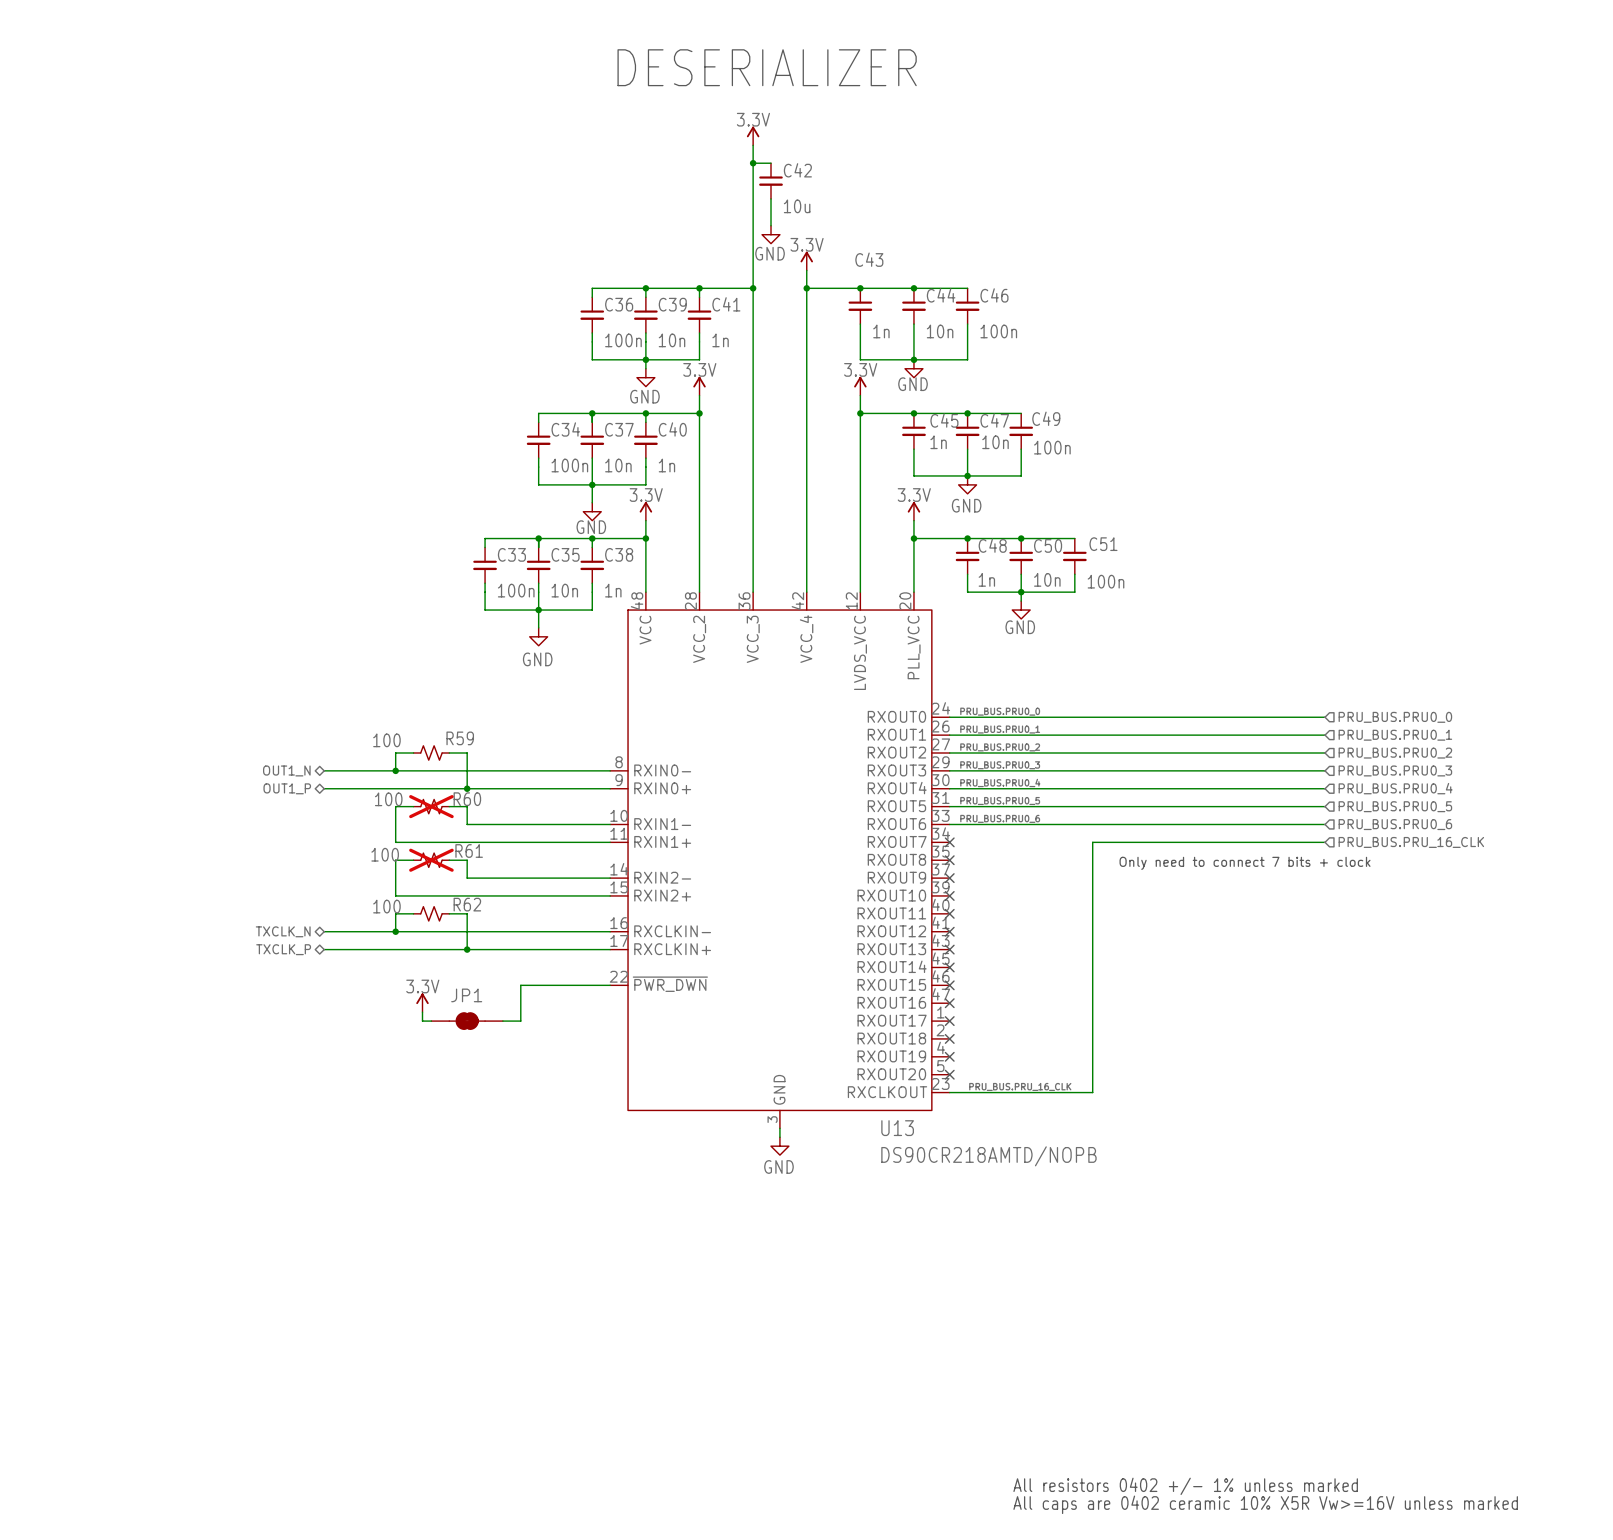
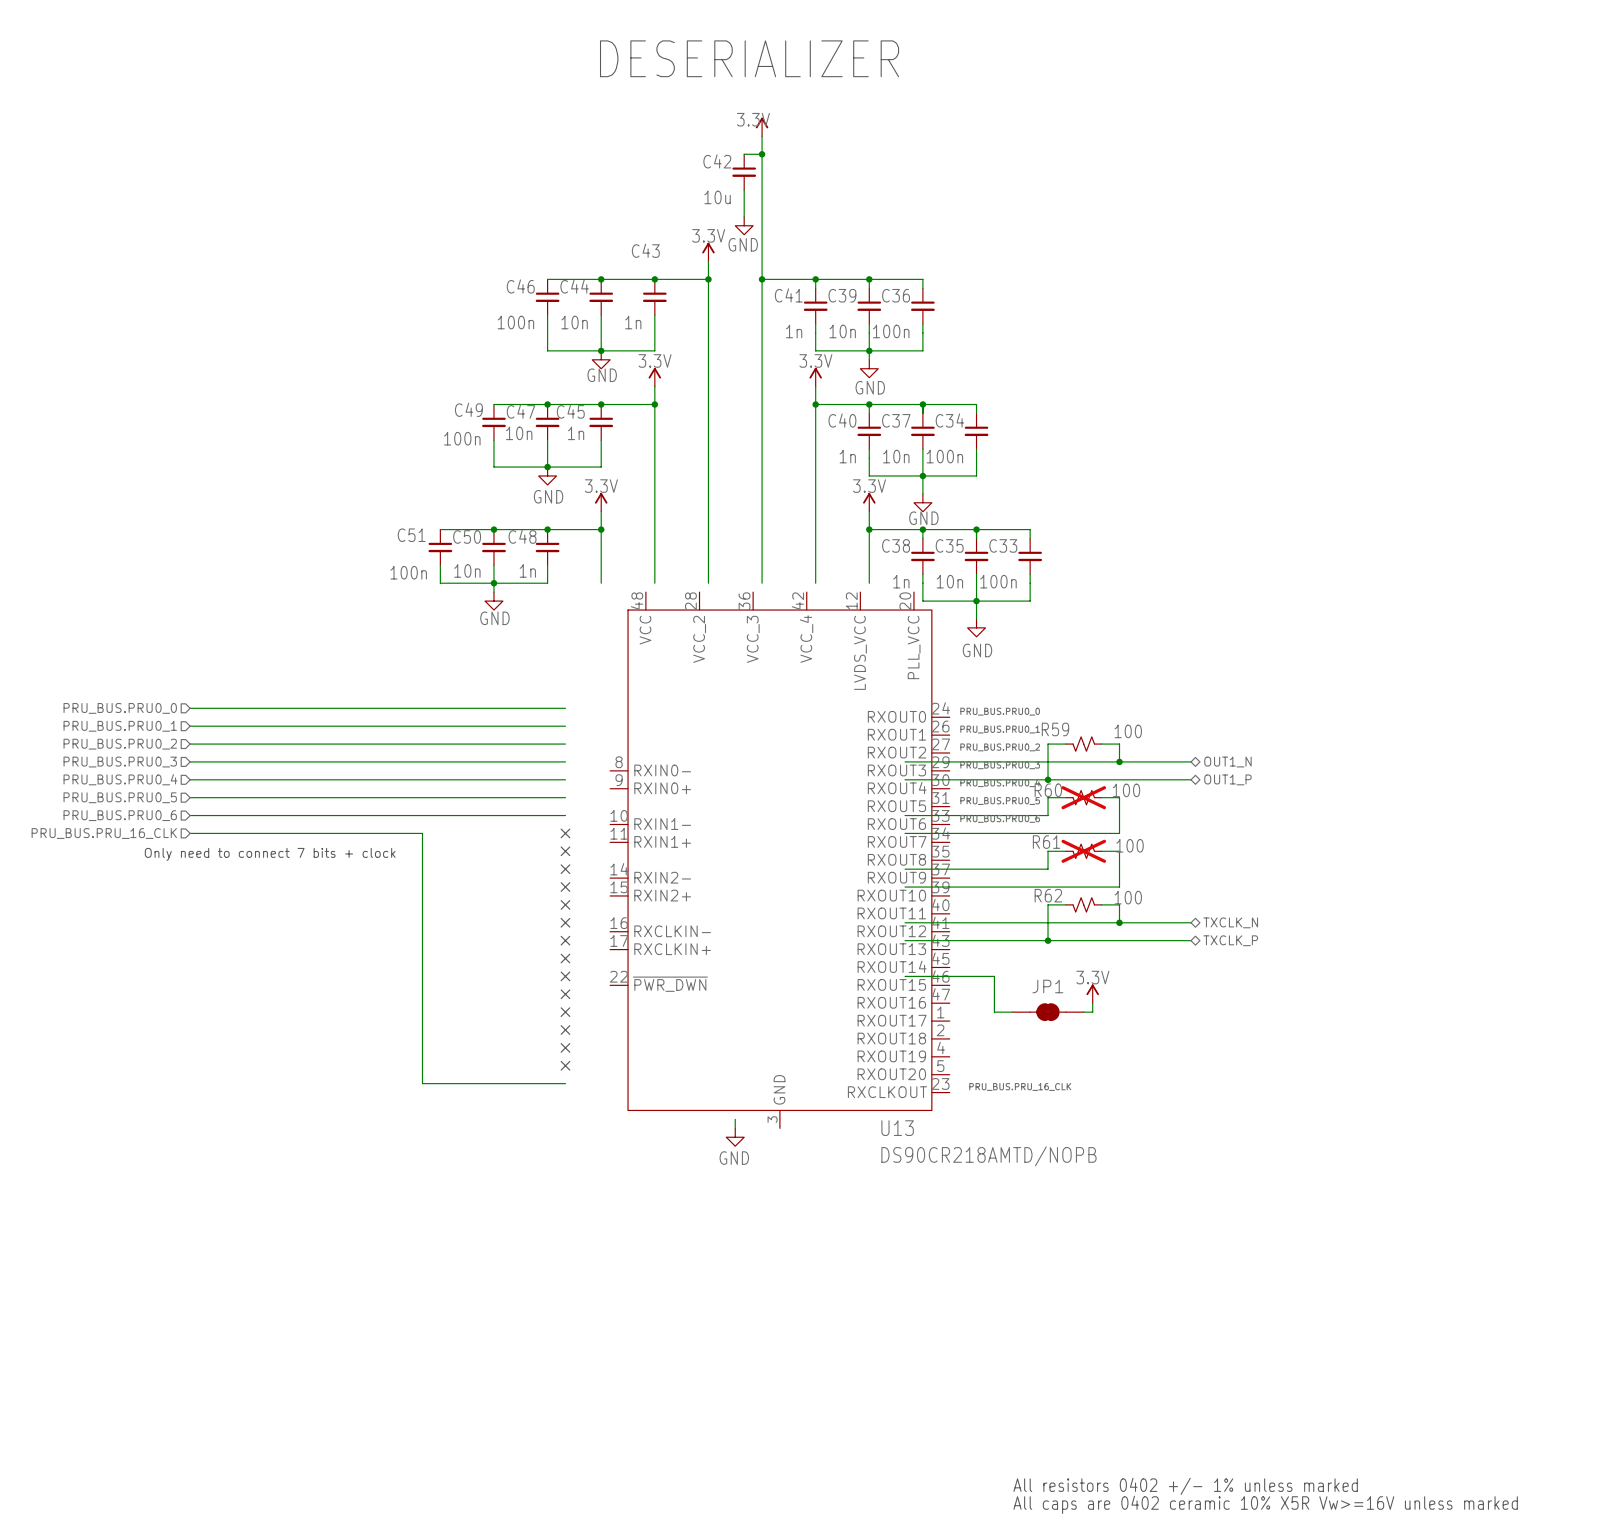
text: none -> DESERIALIZER (749, 58)
text: DESERIALIZER (767, 67) -> none
power symbol position: 3.3V (753, 135) -> 3.3V (762, 127)
wire: (753, 145) (753, 592) -> (762, 136) (762, 583)
wire: (753, 163) (771, 163) -> (744, 154) (762, 154)
junction position: (753, 163) -> (762, 154)
C42 name position: C42 (797, 170) -> C42 (717, 161)
C42 position: (771, 181) -> (744, 172)
wire: (771, 198) (771, 225) -> (744, 190) (744, 216)
C42 value position: 10u (797, 206) -> 10u (717, 197)
power symbol position: GND (771, 234) -> GND (744, 225)
power symbol: none -> 3.3V (708, 252)
C43 name position: C43 (869, 259) -> C43 (645, 250)
power symbol: 3.3V (806, 261) -> none
wire: (806, 270) (806, 592) -> (708, 261) (708, 583)
wire: none -> (547, 279) (708, 279)
junction: none -> (601, 279)
wire: none -> (762, 279) (922, 279) (922, 288)
wire: none -> (869, 279) (869, 288)
wire: (645, 288) (645, 297) -> none
junction position: (645, 288) -> (654, 279)
wire: (699, 288) (699, 297) -> (815, 279) (815, 288)
junction position: (699, 288) -> (708, 279)
wire: (753, 288) (592, 288) (592, 297) -> none
junction position: (753, 288) -> (762, 279)
wire: (806, 288) (967, 288) -> none
junction position: (806, 288) -> (815, 279)
junction position: (860, 288) -> (869, 279)
junction: (913, 288) -> none
C44 name position: C44 (941, 295) -> C44 (574, 286)
C46 name position: C46 (994, 295) -> C46 (520, 286)
C36 name position: C36 (619, 304) -> C36 (896, 295)
C39 name position: C39 (672, 304) -> C39 (842, 295)
C41 name position: C41 (726, 304) -> C41 (788, 295)
C43 position: (860, 306) -> (654, 297)
C44 position: (913, 306) -> (601, 297)
C46 position: (967, 306) -> (547, 297)
wire: none -> (547, 315) (547, 350) (654, 350) (654, 315)
C36 position: (592, 315) -> (922, 306)
C39 position: (645, 315) -> (869, 306)
C41 position: (699, 315) -> (815, 306)
wire: none -> (815, 324) (815, 350) (922, 350) (922, 324)
wire: (860, 324) (860, 359) (967, 359) (967, 324) -> none
wire: (913, 324) (913, 359) -> (869, 324) (869, 359)
C43 value position: 1n (881, 331) -> 1n (633, 322)
C44 value position: 10n (940, 331) -> 10n (574, 322)
C46 value position: 100n (998, 331) -> 100n (515, 322)
wire: (592, 333) (592, 359) (699, 359) (699, 333) -> none
wire: (645, 333) (645, 368) -> (601, 315) (601, 350)
C36 value position: 100n (623, 340) -> 100n (891, 331)
C39 value position: 10n (672, 340) -> 10n (842, 331)
C41 value position: 1n (720, 340) -> 1n (794, 331)
junction: none -> (601, 350)
junction: none -> (869, 350)
junction: (645, 359) -> none
junction: (913, 359) -> none
power symbol position: GND (913, 368) -> GND (869, 368)
power symbol text position: 3.3V (699, 369) -> 3.3V (655, 360)
power symbol text position: 3.3V (860, 369) -> 3.3V (815, 360)
power symbol position: GND (645, 377) -> GND (601, 359)
power symbol text position: GND (913, 384) -> GND (870, 387)
power symbol position: 3.3V (699, 386) -> 3.3V (654, 377)
power symbol position: 3.3V (860, 386) -> 3.3V (815, 377)
wire: (699, 395) (699, 592) -> (654, 386) (654, 583)
wire: (860, 395) (860, 592) -> (815, 386) (815, 583)
power symbol text position: GND (644, 396) -> GND (602, 375)
wire: none -> (493, 404) (654, 404)
junction: none -> (547, 404)
wire: none -> (815, 404) (976, 404) (976, 413)
junction: none -> (815, 404)
wire: none -> (869, 404) (869, 413)
wire: none -> (922, 404) (922, 413)
junction position: (592, 413) -> (601, 404)
wire: (645, 413) (645, 422) -> none
junction position: (645, 413) -> (654, 404)
wire: (699, 413) (538, 413) (538, 422) -> none
junction: (699, 413) -> none
wire: (860, 413) (1021, 413) -> none
junction position: (860, 413) -> (869, 404)
junction position: (913, 413) -> (922, 404)
junction: (967, 413) -> none
C49 name position: C49 (1046, 418) -> C49 (468, 409)
C45 name position: C45 (944, 420) -> C45 (570, 411)
C47 name position: C47 (994, 420) -> C47 (520, 411)
C34 name position: C34 (565, 429) -> C34 (949, 420)
C37 name position: C37 (619, 429) -> C37 (896, 420)
C40 name position: C40 (672, 429) -> C40 (842, 420)
C45 position: (913, 431) -> (601, 422)
C47 position: (967, 431) -> (547, 422)
C49 position: (1021, 431) -> (493, 422)
C34 position: (538, 440) -> (976, 431)
wire: none -> (547, 440) (547, 467)
C37 position: (592, 440) -> (922, 431)
C40 position: (645, 440) -> (869, 431)
C45 value position: 1n (938, 442) -> 1n (576, 433)
C47 value position: 10n (995, 442) -> 10n (519, 433)
C49 value position: 100n (1052, 447) -> 100n (462, 438)
wire: (913, 449) (913, 475) -> (869, 449) (869, 475) (913, 475)
wire: none -> (922, 449) (922, 493)
wire: (967, 449) (967, 475) -> none
wire: (1021, 449) (1021, 475) (976, 475) -> (976, 449) (976, 475)
wire: (538, 458) (538, 484) (645, 484) (645, 458) -> (493, 440) (493, 467) (601, 467) (601, 440)
wire: (592, 458) (592, 502) -> none
C34 value position: 100n (569, 465) -> 100n (944, 456)
C37 value position: 10n (618, 465) -> 10n (896, 456)
C40 value position: 1n (666, 465) -> 1n (847, 456)
junction: none -> (547, 467)
junction: none -> (922, 475)
junction: (967, 475) -> none
junction: (592, 484) -> none
power symbol position: GND (967, 484) -> GND (922, 502)
power symbol text position: 3.3V (646, 495) -> 3.3V (601, 486)
power symbol text position: 3.3V (914, 495) -> 3.3V (869, 486)
power symbol text position: GND (966, 505) -> GND (923, 518)
power symbol position: GND (592, 511) -> GND (547, 475)
power symbol position: 3.3V (645, 511) -> 3.3V (601, 502)
power symbol position: 3.3V (913, 511) -> 3.3V (869, 502)
wire: (645, 520) (645, 592) -> (601, 511) (601, 583)
wire: (913, 520) (913, 592) -> (869, 511) (869, 583)
power symbol text position: GND (591, 527) -> GND (548, 496)
wire: none -> (440, 529) (601, 529)
junction: none -> (493, 529)
wire: none -> (869, 529) (1030, 529) (1030, 538)
junction: none -> (869, 529)
wire: none -> (922, 529) (922, 538)
wire: none -> (976, 529) (976, 538)
wire: (538, 538) (538, 547) -> none
junction position: (538, 538) -> (547, 529)
wire: (592, 538) (592, 547) -> none
junction position: (592, 538) -> (601, 529)
wire: (645, 538) (485, 538) (485, 547) -> none
junction: (645, 538) -> none
wire: (913, 538) (1074, 538) -> none
junction position: (913, 538) -> (922, 529)
junction position: (967, 538) -> (976, 529)
junction: (1021, 538) -> none
C51 name position: C51 (1103, 544) -> C51 (411, 535)
C48 name position: C48 (992, 545) -> C48 (522, 536)
C50 name position: C50 (1048, 545) -> C50 (467, 537)
C33 name position: C33 (511, 554) -> C33 (1003, 545)
C35 name position: C35 (565, 554) -> C35 (949, 545)
C38 name position: C38 (619, 554) -> C38 (896, 545)
C48 position: (967, 556) -> (547, 547)
C50 position: (1021, 556) -> (493, 547)
C51 position: (1074, 556) -> (440, 547)
wire: none -> (440, 565) (440, 583) (547, 583) (547, 565)
C33 position: (485, 565) -> (1030, 556)
wire: none -> (493, 565) (493, 592)
C35 position: (538, 565) -> (976, 556)
C38 position: (592, 565) -> (922, 556)
wire: none -> (922, 574) (922, 601) (1030, 601) (1030, 574)
wire: (967, 574) (967, 592) (1074, 592) (1074, 574) -> none
wire: none -> (976, 574) (976, 618)
wire: (1021, 574) (1021, 601) -> none
C48 value position: 1n (986, 579) -> 1n (527, 570)
C50 value position: 10n (1047, 579) -> 10n (467, 570)
C51 value position: 100n (1106, 581) -> 100n (408, 572)
wire: (485, 583) (485, 610) (592, 610) (592, 583) -> none
junction: none -> (493, 583)
wire: (538, 583) (538, 627) -> none
C33 value position: 100n (516, 590) -> 100n (998, 581)
C35 value position: 10n (564, 590) -> 10n (949, 581)
C38 value position: 1n (613, 590) -> 1n (901, 581)
junction: (1021, 592) -> none
junction: none -> (976, 601)
junction: (538, 610) -> none
power symbol position: GND (1021, 610) -> GND (976, 627)
power symbol text position: GND (1020, 627) -> GND (977, 650)
power symbol position: GND (538, 636) -> GND (493, 601)
power symbol text position: GND (537, 659) -> GND (494, 618)
hierarchical label: none -> PRU_BUS.PRU0_0 (120, 708)
wire: none -> (190, 708) (565, 708)
wire: (949, 717) (1325, 717) -> none
hierarchical label: PRU_BUS.PRU0_0 (1395, 717) -> none
hierarchical label: none -> PRU_BUS.PRU0_1 (120, 726)
wire: none -> (190, 726) (565, 726)
wire: (949, 735) (1325, 735) -> none
hierarchical label: PRU_BUS.PRU0_1 (1395, 735) -> none
hierarchical label: none -> PRU_BUS.PRU0_2 (120, 744)
wire: none -> (190, 744) (565, 744)
wire: none -> (1065, 744) (1048, 744) (1048, 779)
wire: none -> (1101, 744) (1119, 744) (1119, 761)
wire: (413, 752) (395, 752) (395, 770) -> none
R59 flip: as is (431, 752) -> left-right (1083, 744)
R59 position: (431, 752) -> (1083, 744)
wire: (449, 752) (467, 752) (467, 788) -> none
wire: (949, 752) (1325, 752) -> none
hierarchical label: PRU_BUS.PRU0_2 (1395, 753) -> none
wire: none -> (190, 761) (565, 761)
wire: none -> (905, 761) (1190, 761)
junction: none -> (1119, 761)
hierarchical label: none -> PRU_BUS.PRU0_3 (120, 762)
hierarchical label: none -> OUT1_N (1227, 762)
hierarchical label: OUT1_N (286, 770) -> none
wire: (324, 770) (610, 770) -> none
junction: (395, 770) -> none
wire: (949, 770) (1325, 770) -> none
hierarchical label: PRU_BUS.PRU0_3 (1395, 770) -> none
hierarchical label: none -> PRU_BUS.PRU0_4 (120, 779)
wire: none -> (190, 779) (565, 779)
wire: none -> (905, 779) (1190, 779)
junction: none -> (1048, 779)
hierarchical label: none -> OUT1_P (1227, 779)
hierarchical label: OUT1_P (287, 788) -> none
wire: (324, 788) (610, 788) -> none
junction: (467, 788) -> none
wire: (949, 788) (1325, 788) -> none
hierarchical label: PRU_BUS.PRU0_4 (1395, 788) -> none
hierarchical label: none -> PRU_BUS.PRU0_5 (120, 797)
wire: none -> (190, 797) (565, 797)
wire: none -> (1065, 797) (1048, 797) (1048, 815) (905, 815)
wire: none -> (1101, 797) (1119, 797) (1119, 833) (905, 833)
wire: (413, 806) (395, 806) (395, 842) (610, 842) -> none
R60 flip: as is (431, 806) -> left-right (1083, 797)
R60 position: (431, 806) -> (1083, 797)
wire: (449, 806) (467, 806) (467, 824) (610, 824) -> none
wire: (949, 806) (1325, 806) -> none
hierarchical label: PRU_BUS.PRU0_5 (1395, 806) -> none
hierarchical label: none -> PRU_BUS.PRU0_6 (120, 815)
wire: none -> (190, 815) (565, 815)
wire: (949, 824) (1325, 824) -> none
hierarchical label: PRU_BUS.PRU0_6 (1395, 824) -> none
hierarchical label: none -> PRU_BUS.PRU_16_CLK (104, 833)
wire: none -> (190, 833) (422, 833) (422, 1012)
no-connect mark: none -> (565, 833)
no-connect mark: (949, 842) -> none
wire: (1325, 842) (1092, 842) (1092, 1003) -> none
hierarchical label: PRU_BUS.PRU_16_CLK (1411, 842) -> none
no-connect mark: none -> (565, 851)
wire: none -> (1065, 851) (1048, 851) (1048, 869) (905, 869)
wire: none -> (1101, 851) (1119, 851) (1119, 887) (905, 887)
text: none -> Only need to connect 7 bits + clock (270, 854)
wire: (413, 860) (395, 860) (395, 895) (610, 895) -> none
R61 flip: as is (431, 860) -> left-right (1083, 851)
R61 position: (431, 860) -> (1083, 851)
wire: (449, 860) (467, 860) (467, 878) (610, 878) -> none
no-connect mark: (949, 860) -> none
text: Only need to connect 7 bits + clock (1245, 863) -> none
no-connect mark: none -> (565, 869)
no-connect mark: (949, 878) -> none
no-connect mark: none -> (565, 887)
no-connect mark: (949, 895) -> none
no-connect mark: none -> (565, 904)
wire: none -> (1065, 904) (1048, 904) (1048, 940)
wire: none -> (1101, 904) (1119, 904) (1119, 922)
wire: (413, 913) (395, 913) (395, 931) -> none
R62 flip: as is (431, 913) -> left-right (1083, 904)
R62 position: (431, 913) -> (1083, 904)
wire: (449, 913) (467, 913) (467, 949) -> none
no-connect mark: (949, 913) -> none
no-connect mark: none -> (565, 922)
wire: none -> (905, 922) (1190, 922)
junction: none -> (1119, 922)
hierarchical label: none -> TXCLK_N (1230, 922)
hierarchical label: TXCLK_N (283, 931) -> none
wire: (324, 931) (610, 931) -> none
junction: (395, 931) -> none
no-connect mark: (949, 931) -> none
no-connect mark: none -> (565, 940)
wire: none -> (905, 940) (1190, 940)
junction: none -> (1048, 940)
hierarchical label: none -> TXCLK_P (1230, 940)
hierarchical label: TXCLK_P (283, 949) -> none
wire: (324, 949) (610, 949) -> none
junction: (467, 949) -> none
no-connect mark: (949, 949) -> none
no-connect mark: none -> (565, 958)
no-connect mark: (949, 967) -> none
no-connect mark: none -> (565, 976)
wire: none -> (905, 976) (994, 976) (994, 1012) (1012, 1012)
wire: (610, 985) (520, 985) (520, 1021) (502, 1021) -> none
no-connect mark: (949, 985) -> none
power symbol: none -> 3.3V (1092, 993)
no-connect mark: none -> (565, 994)
power symbol: 3.3V (422, 1002) -> none
no-connect mark: (949, 1003) -> none
no-connect mark: none -> (565, 1012)
wire: (1092, 1012) (1092, 1092) (949, 1092) -> (1092, 1012) (1083, 1012)
wire: (422, 1021) (431, 1021) -> (422, 1021) (422, 1083) (565, 1083)
JP1 flip: as is (467, 1021) -> left-right (1048, 1012)
JP1 position: (467, 1021) -> (1048, 1012)
no-connect mark: (949, 1021) -> none
no-connect mark: none -> (565, 1030)
no-connect mark: (949, 1038) -> none
no-connect mark: none -> (565, 1047)
no-connect mark: (949, 1056) -> none
no-connect mark: none -> (565, 1065)
no-connect mark: (949, 1074) -> none
wire: (779, 1128) (779, 1137) -> (735, 1119) (735, 1128)
power symbol position: GND (779, 1146) -> GND (735, 1137)

